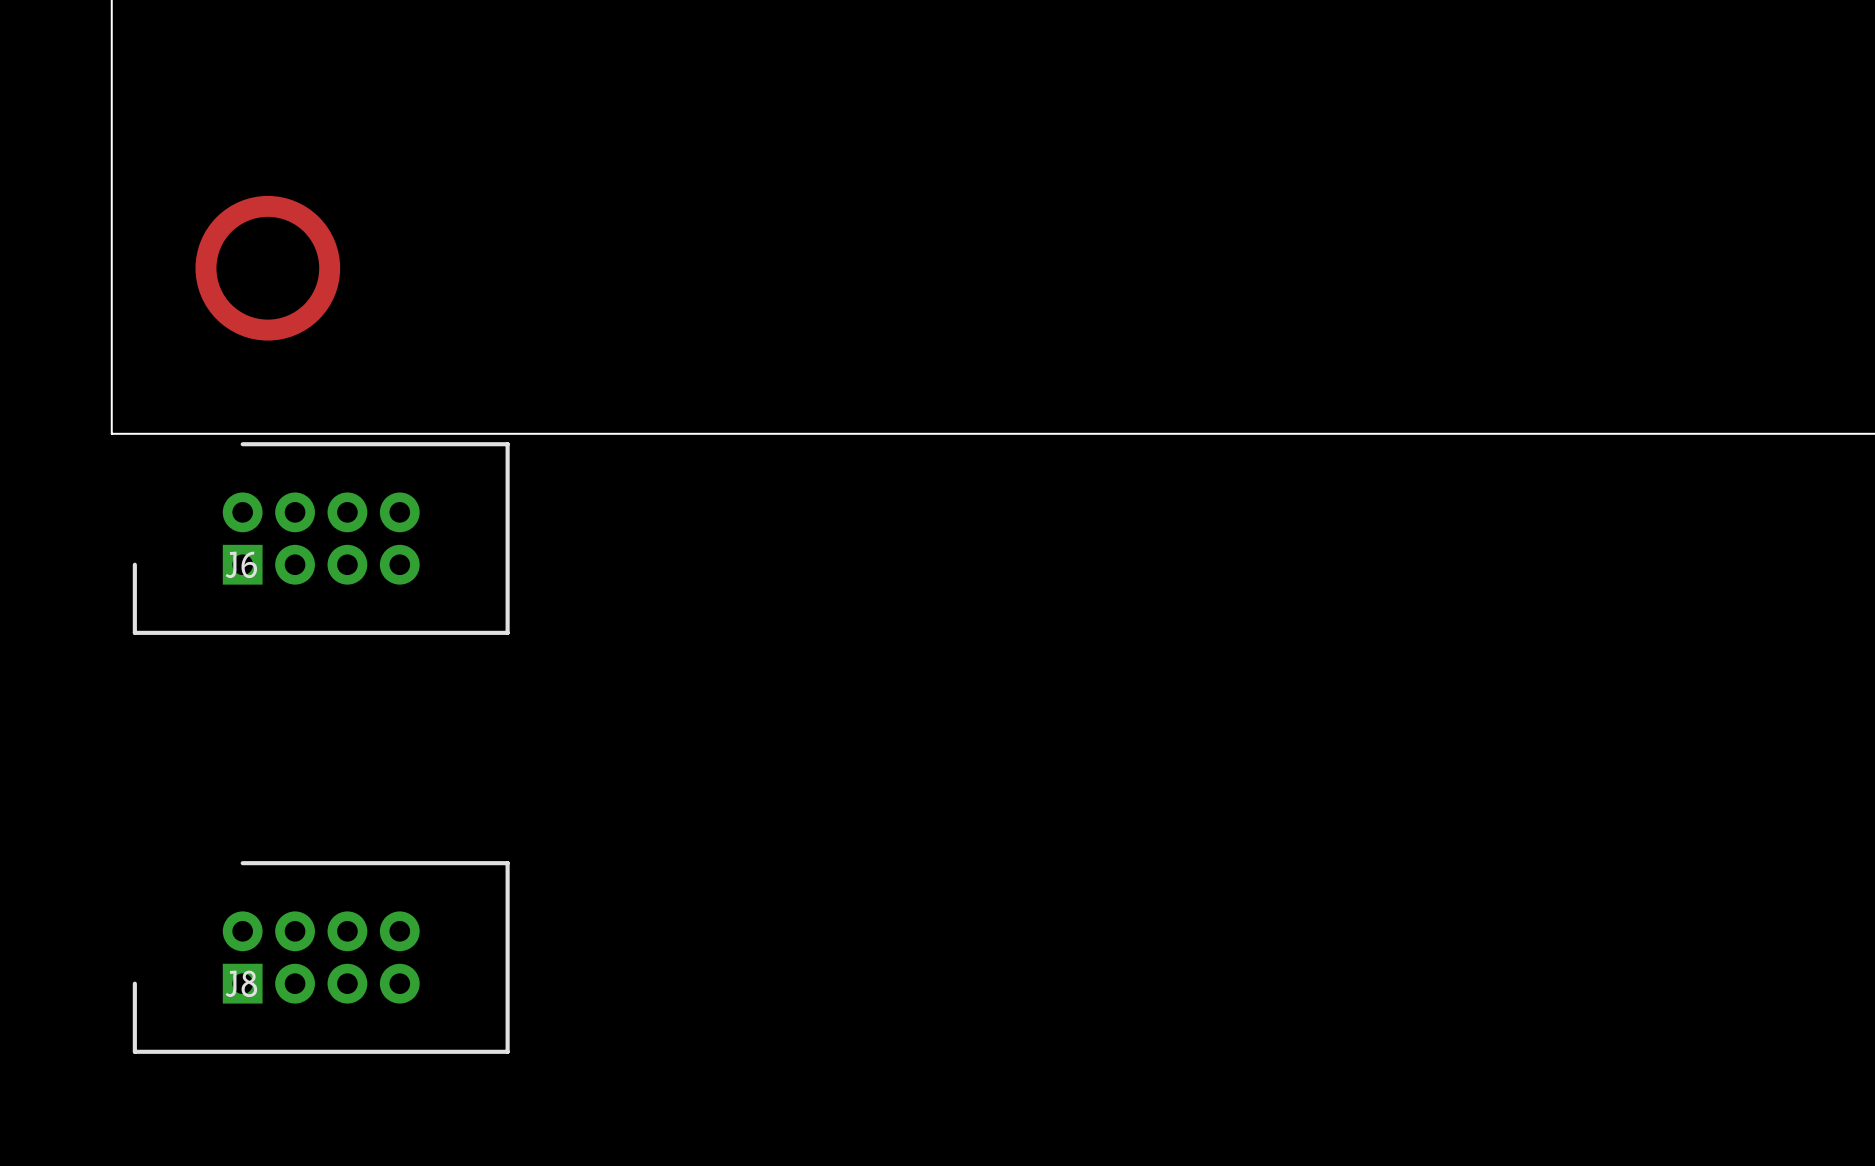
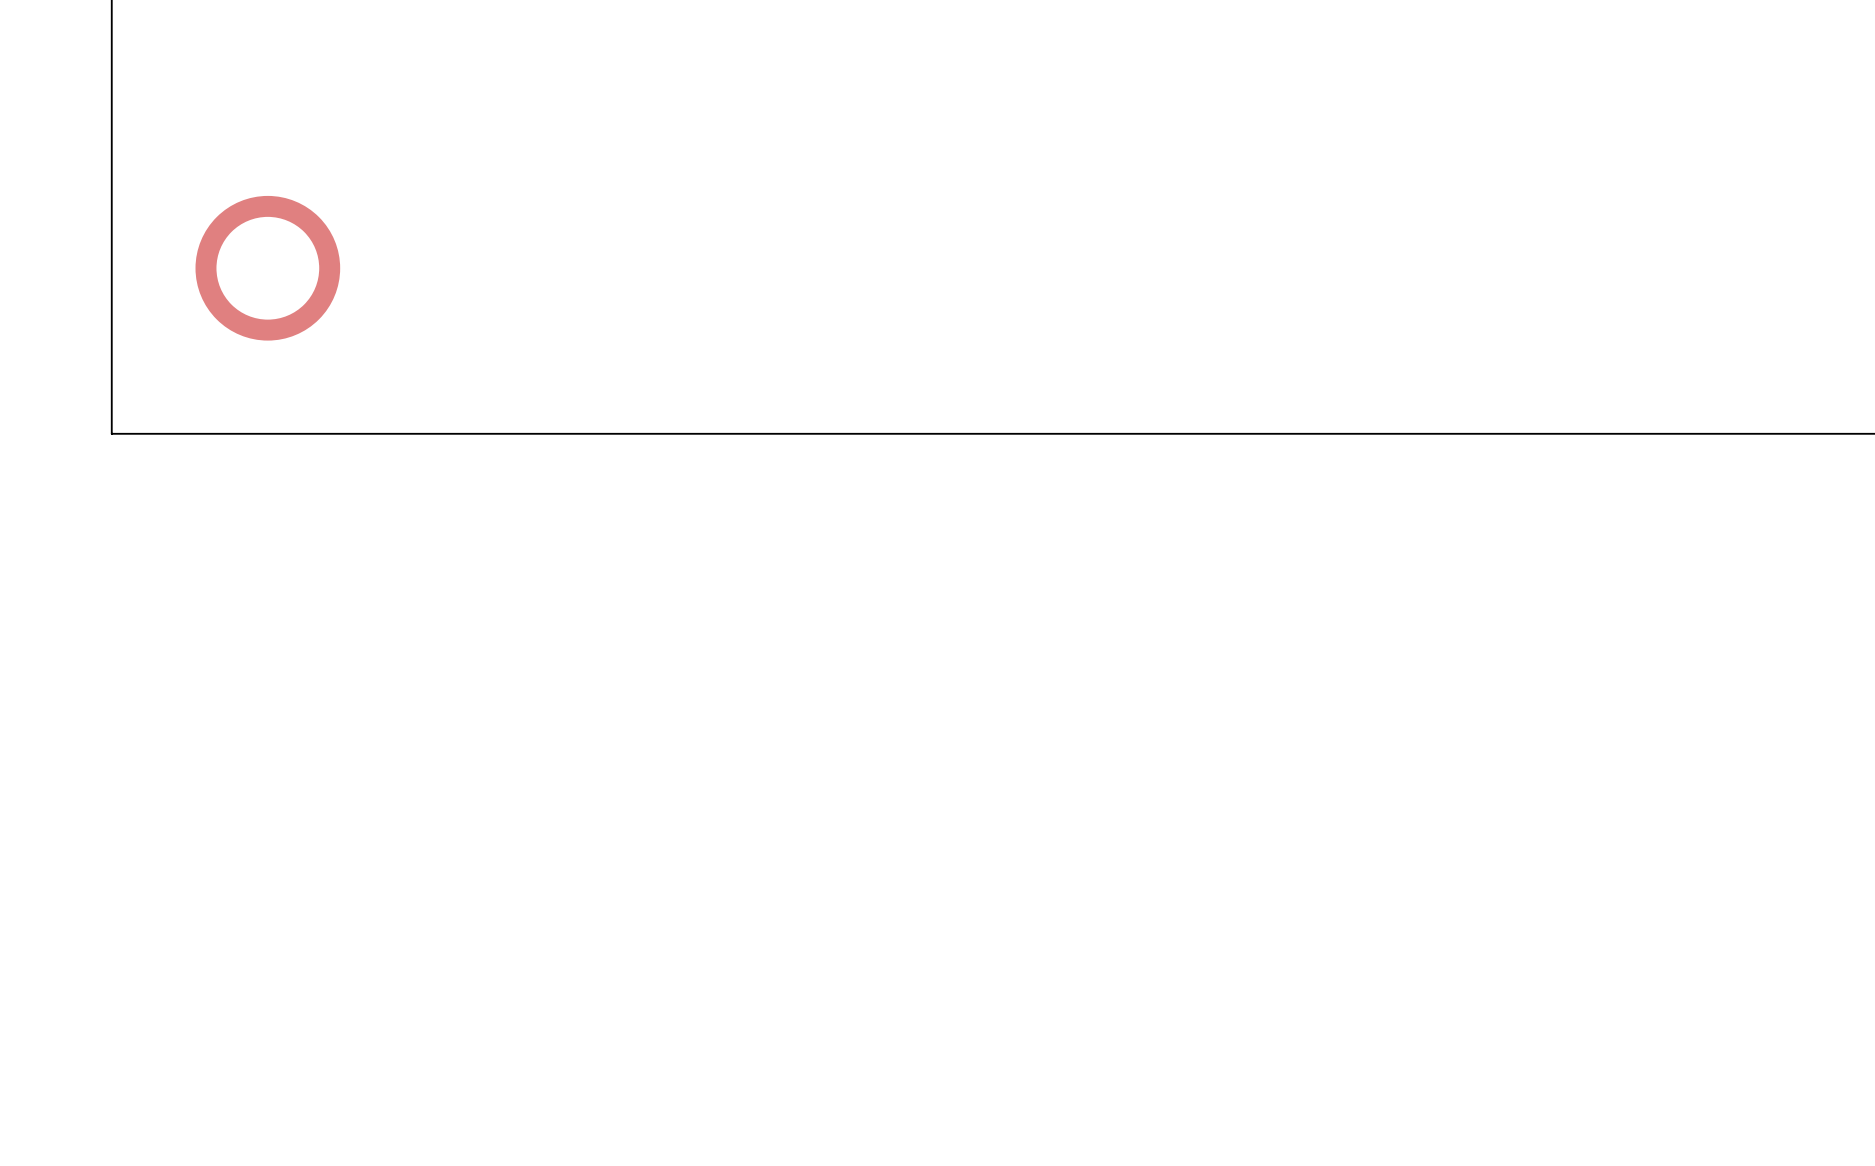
J6: (321, 538) -> none
J8: (321, 957) -> none

